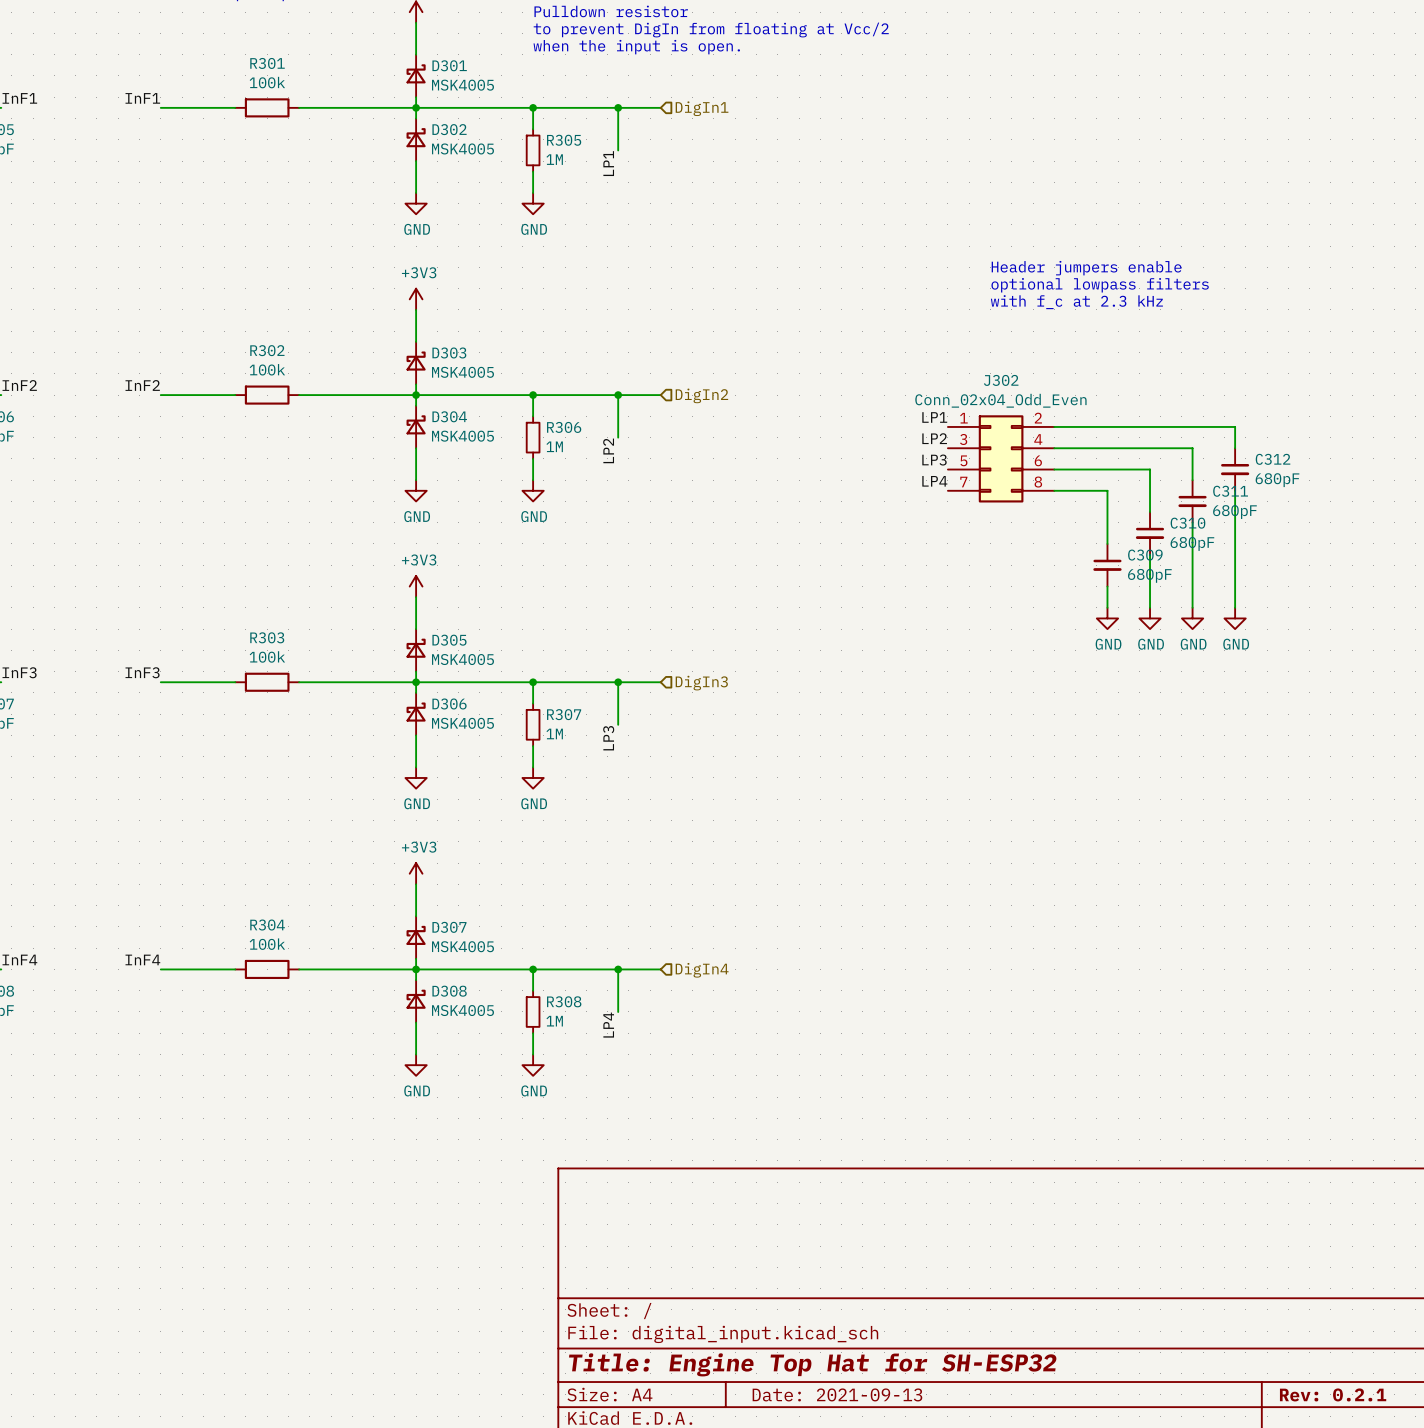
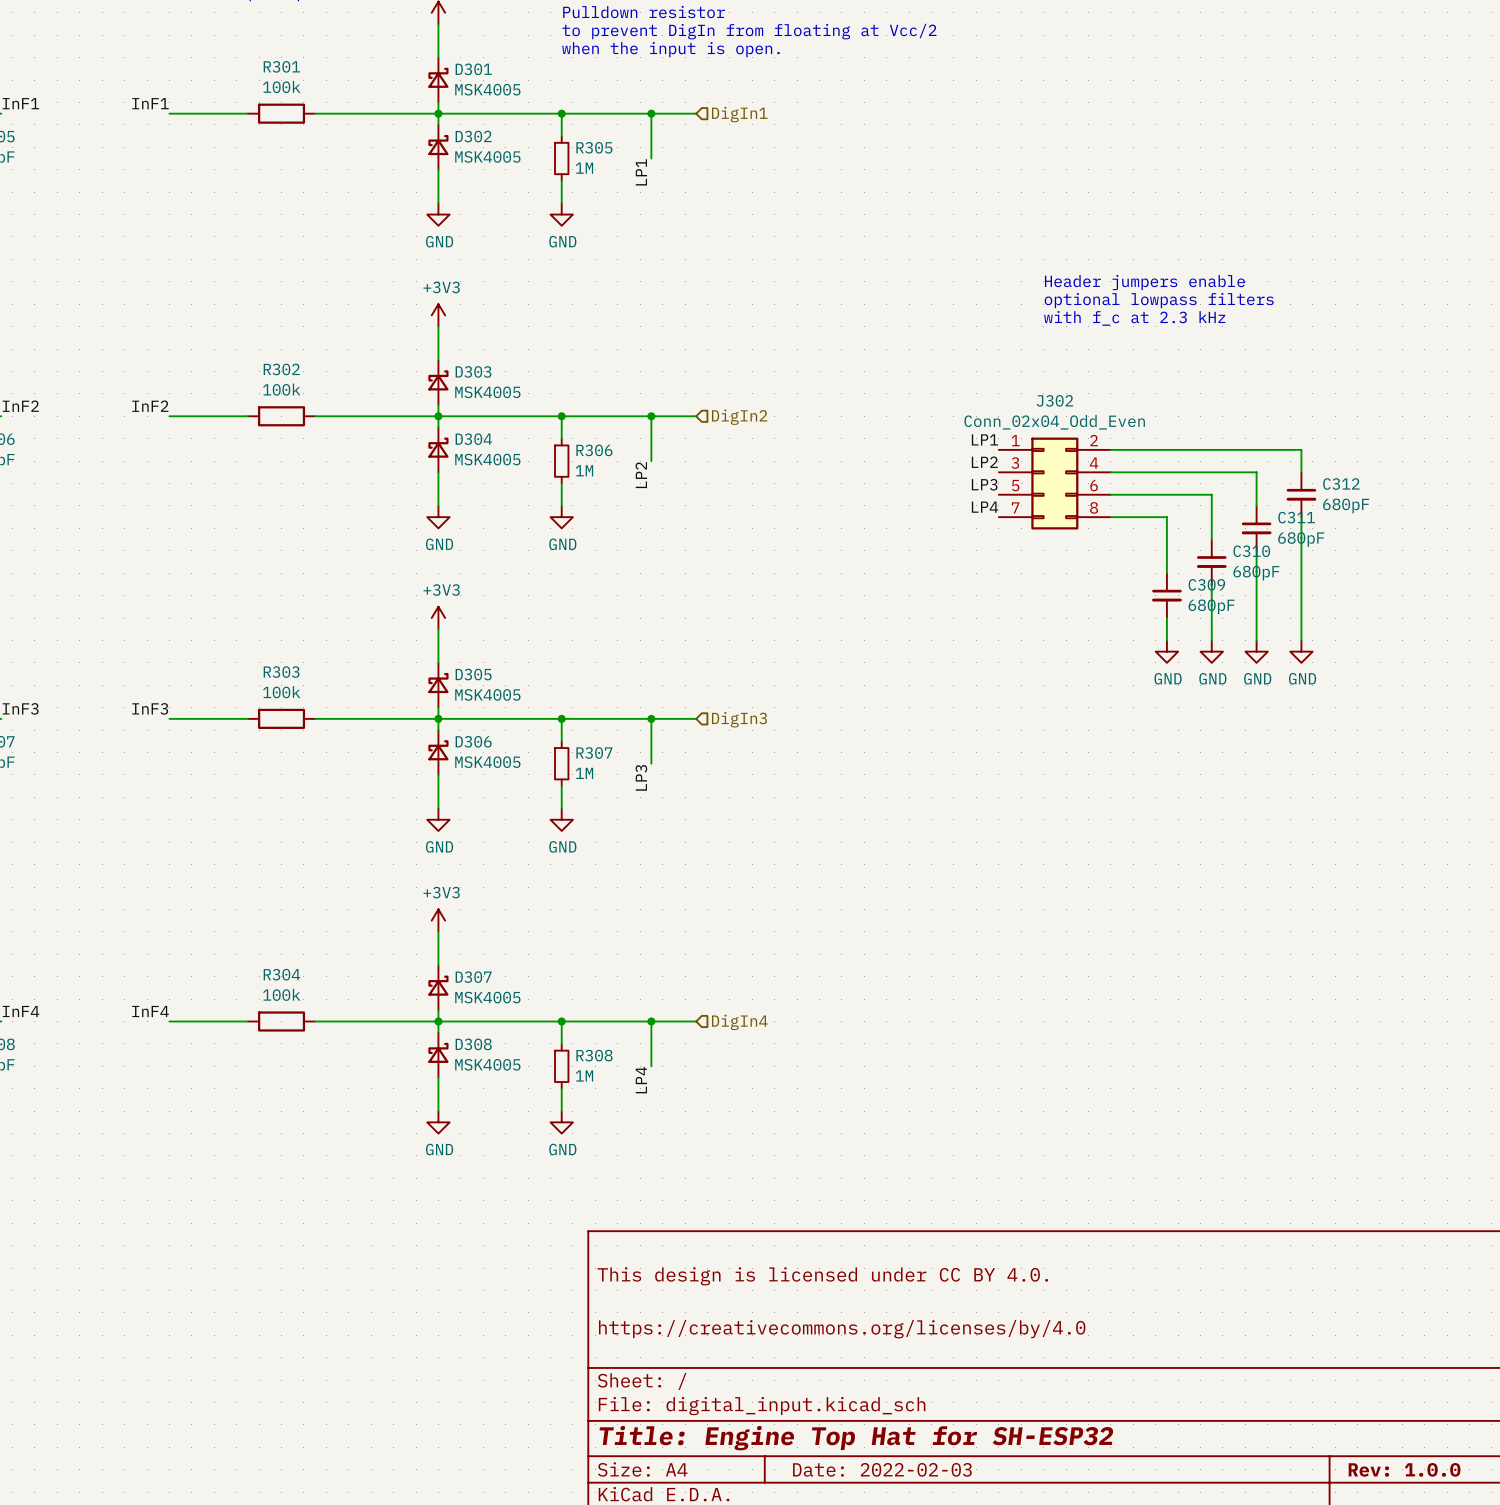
title block: none -> This design is licensed under CC BY 4.0. (822, 1276)
title block: none -> https://creativecommons.org/licenses/by/4.0 (842, 1329)
title block: Date: 2021-09-13 (837, 1394) -> Date: 2022-02-03 (882, 1469)
title block: Rev: 0.2.1 (1333, 1394) -> Rev: 1.0.0 (1404, 1469)

